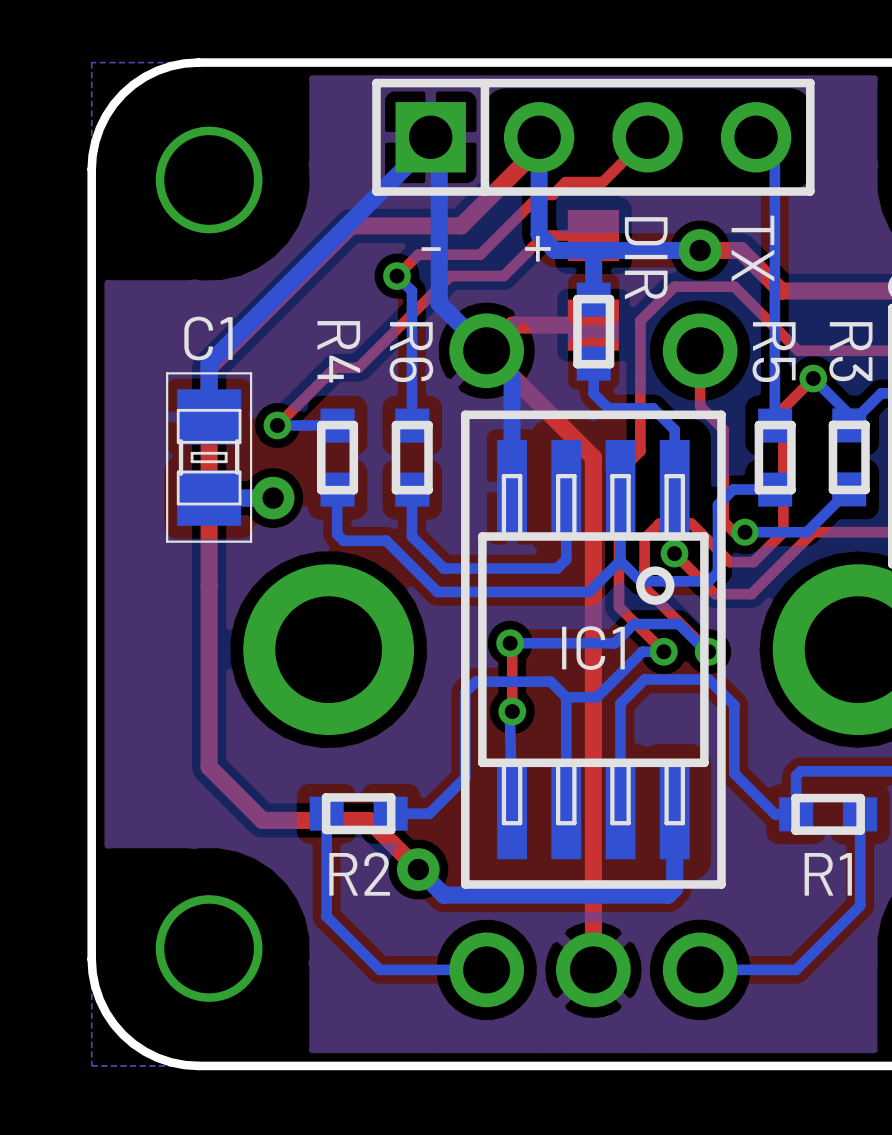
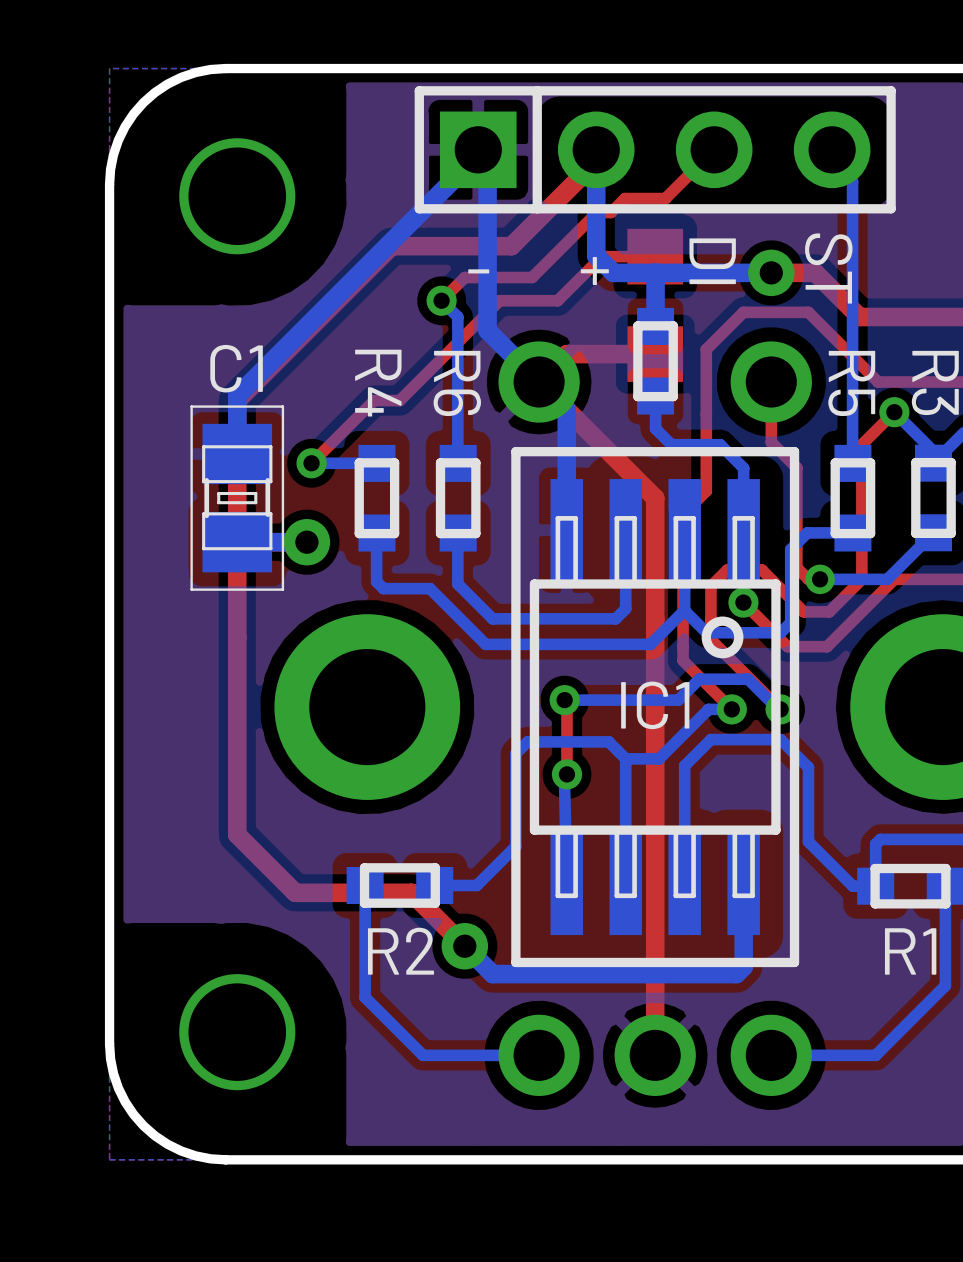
text: TX (752, 248) -> ST (828, 268)
text: DIR (646, 258) -> DI (712, 261)

